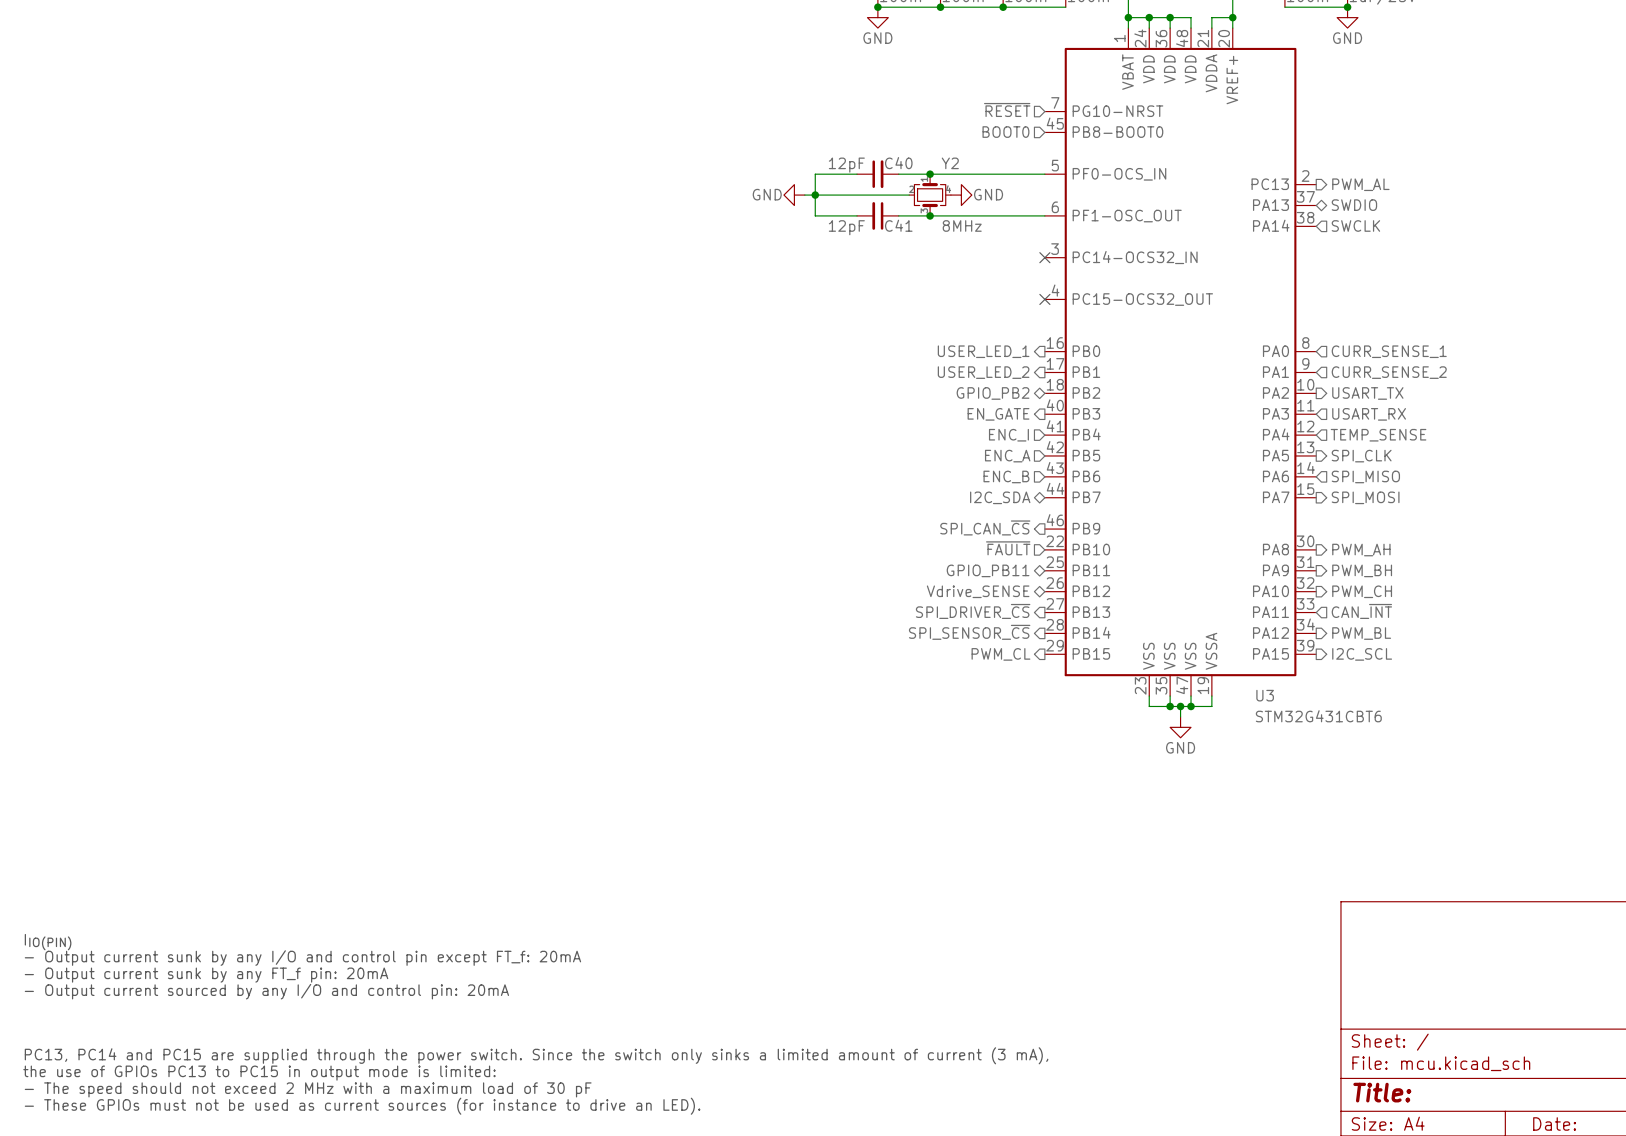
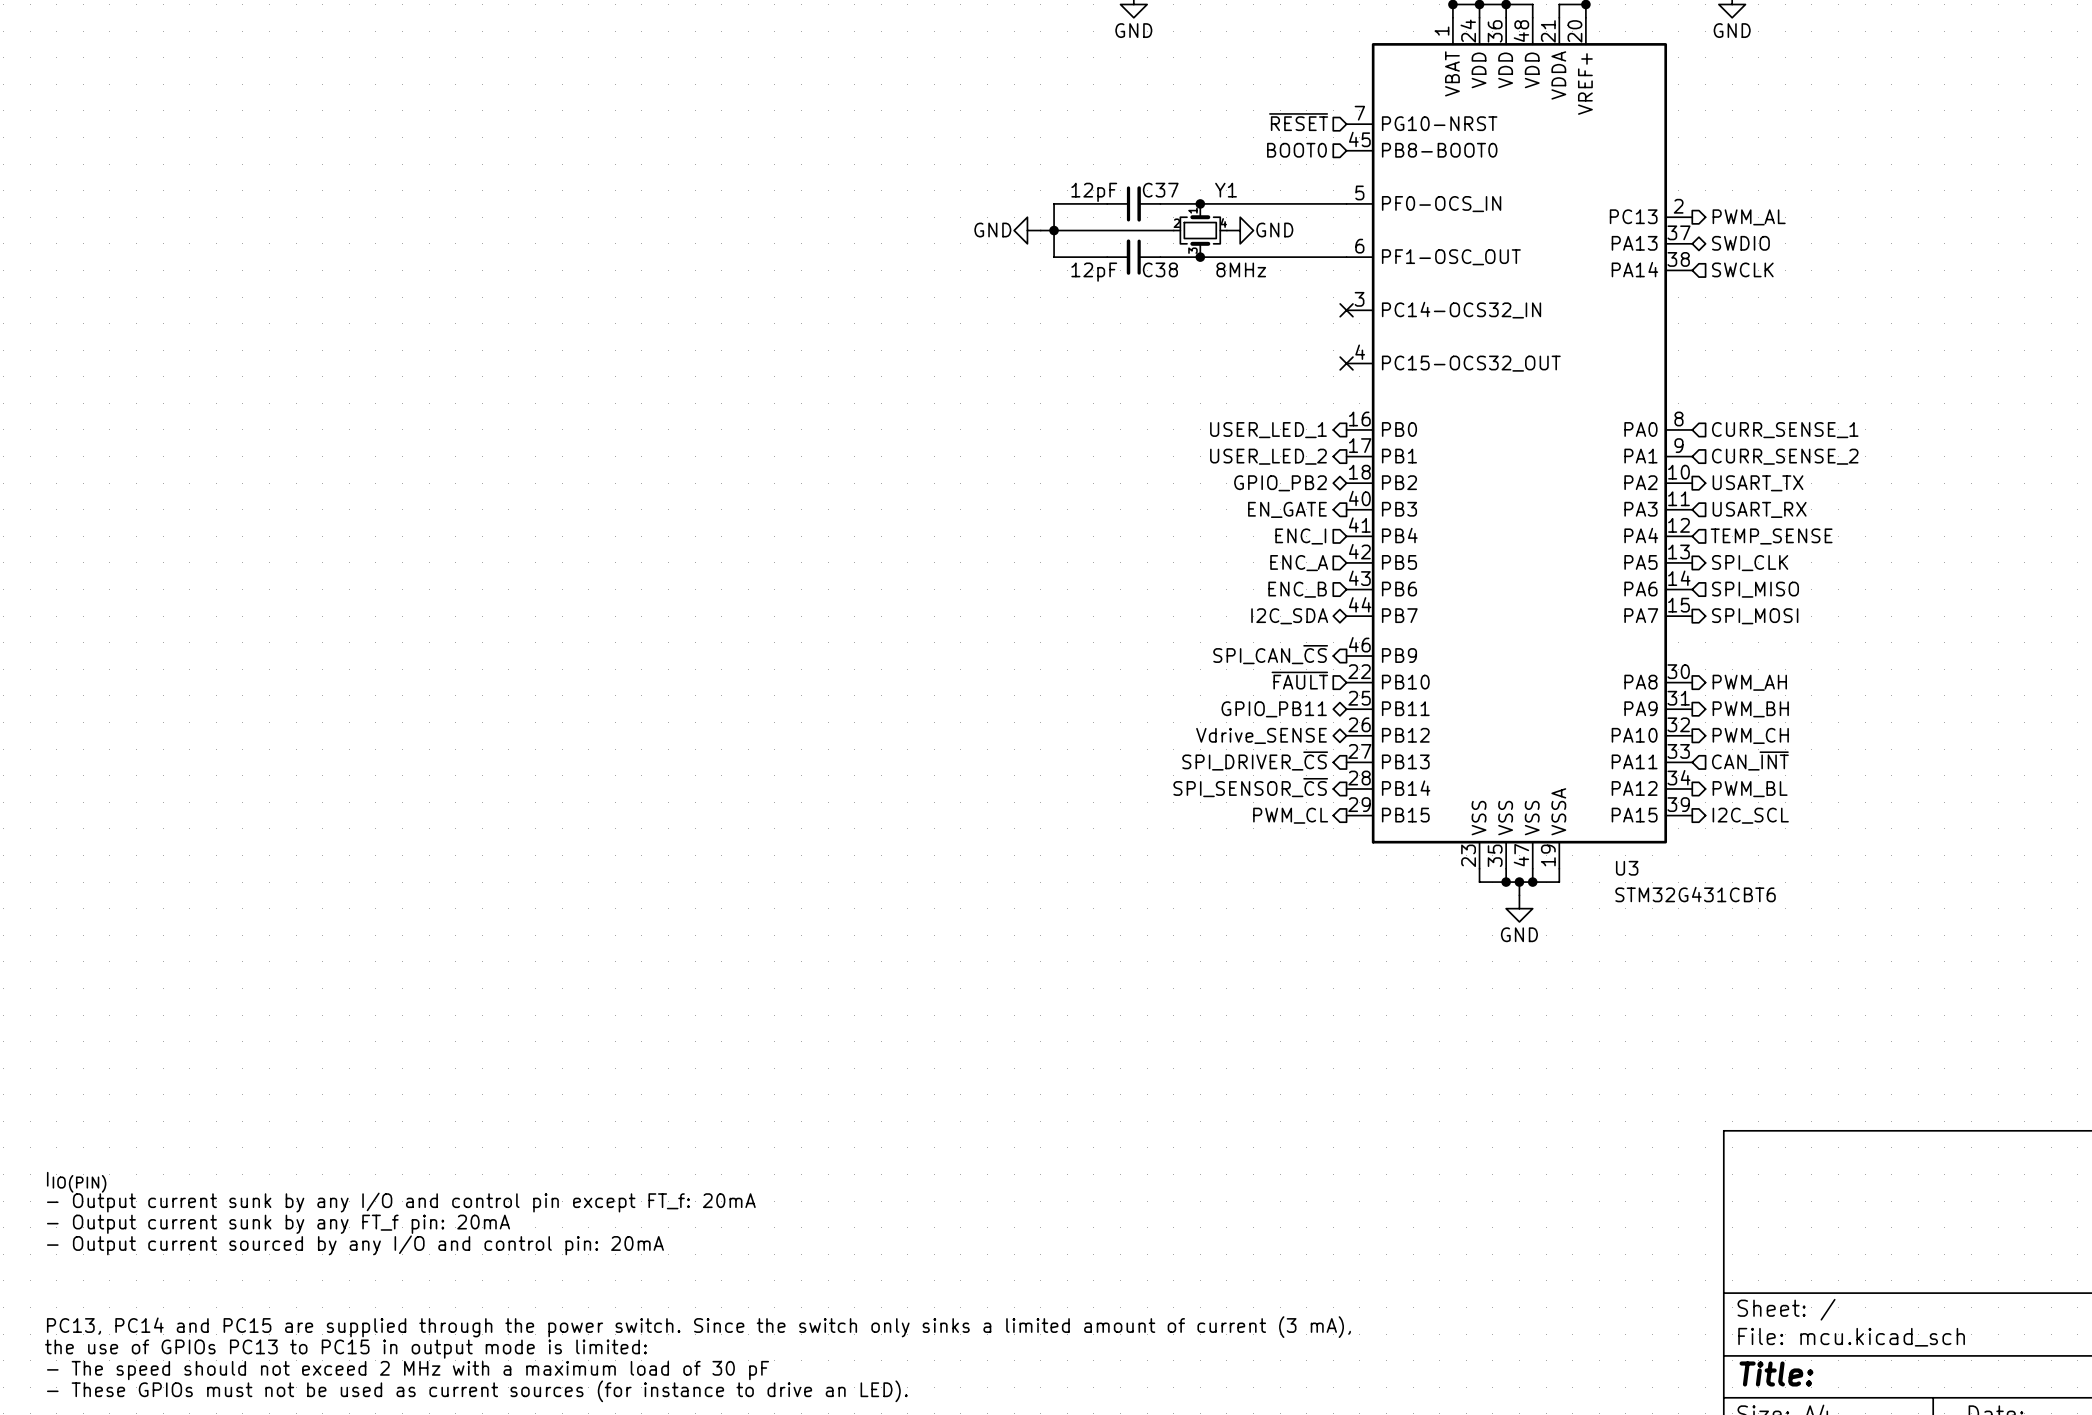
C40 name: C40 (898, 163) -> C37 (1160, 190)
Y2 name: Y2 (950, 163) -> Y1 (1226, 190)
C41 name: C41 (898, 225) -> C38 (1160, 269)

